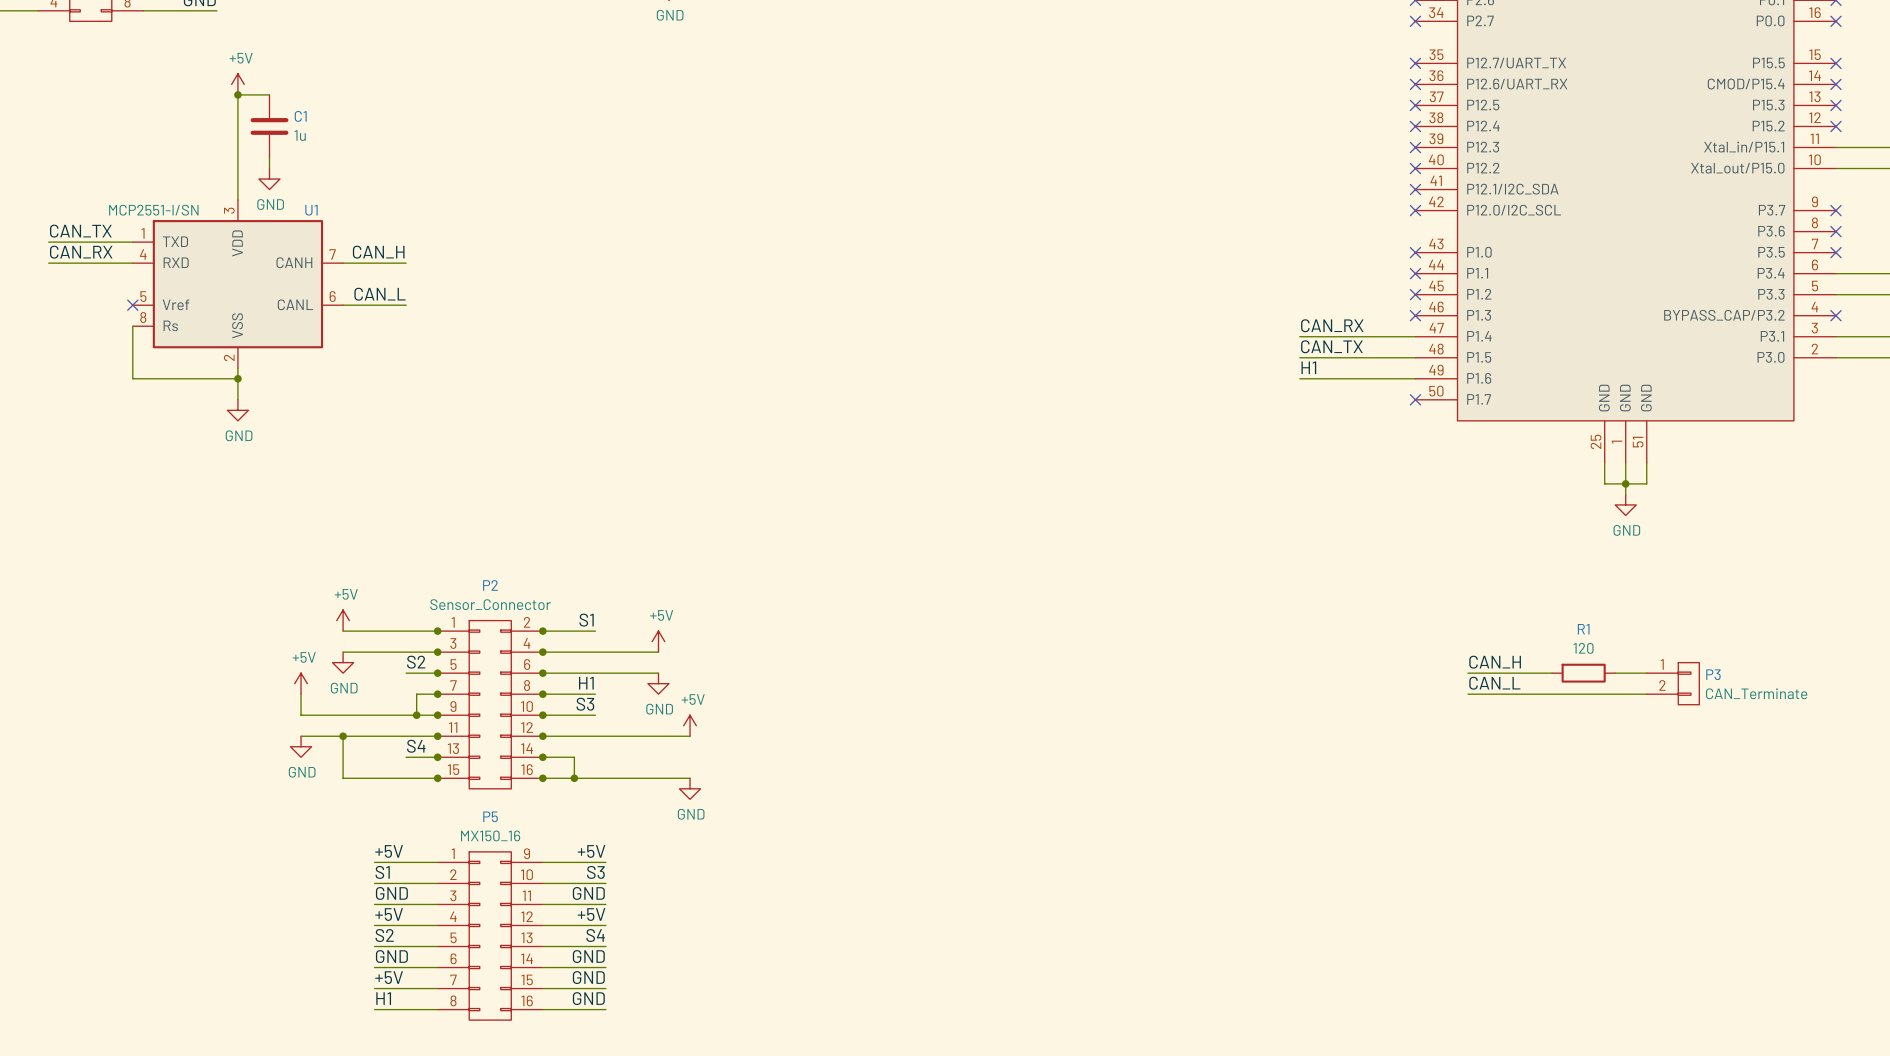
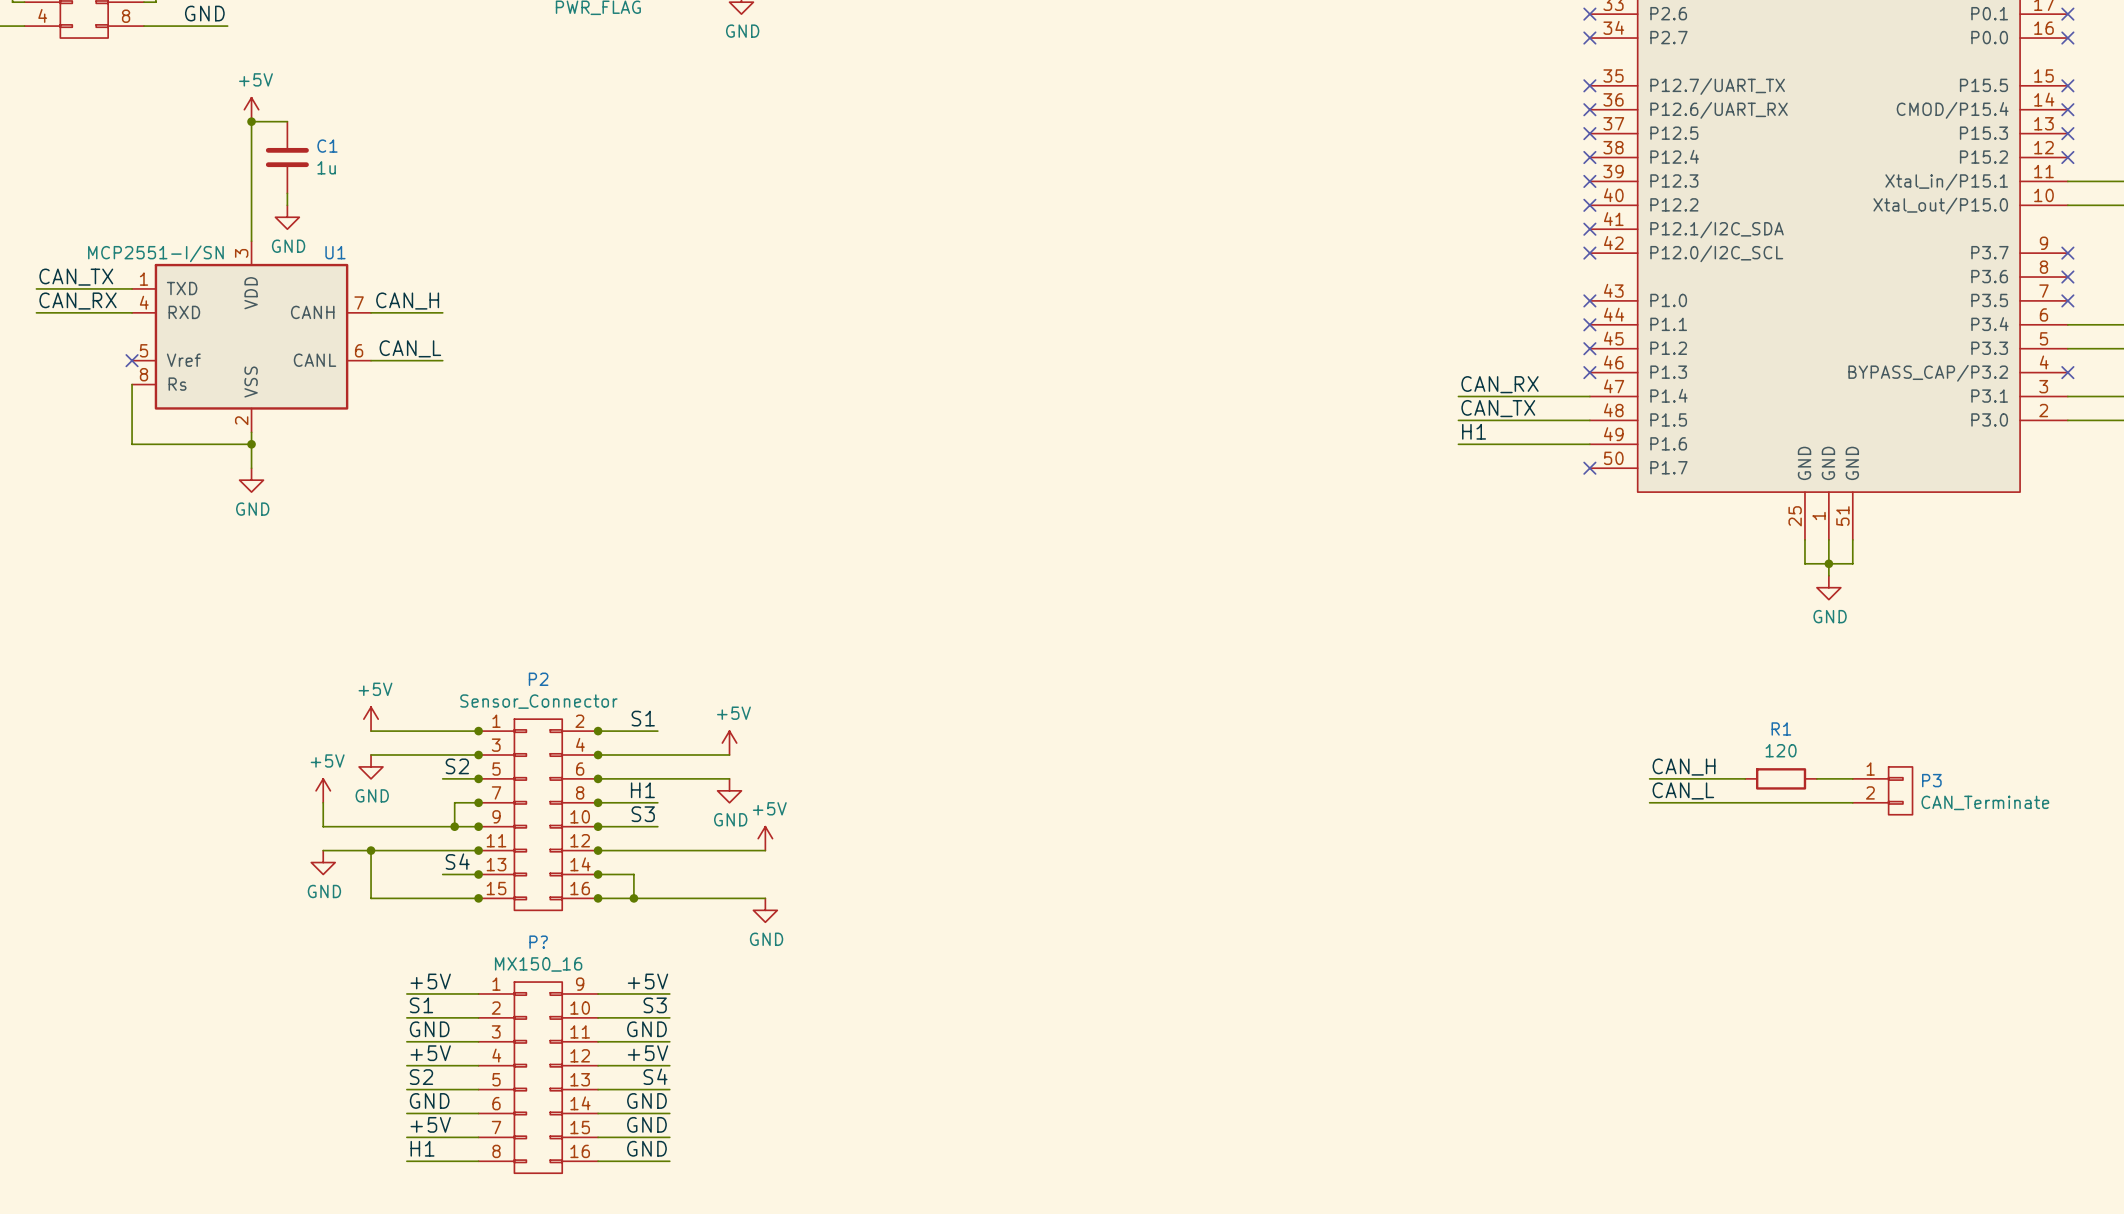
P5 name: P5 (490, 816) -> P? (538, 942)

